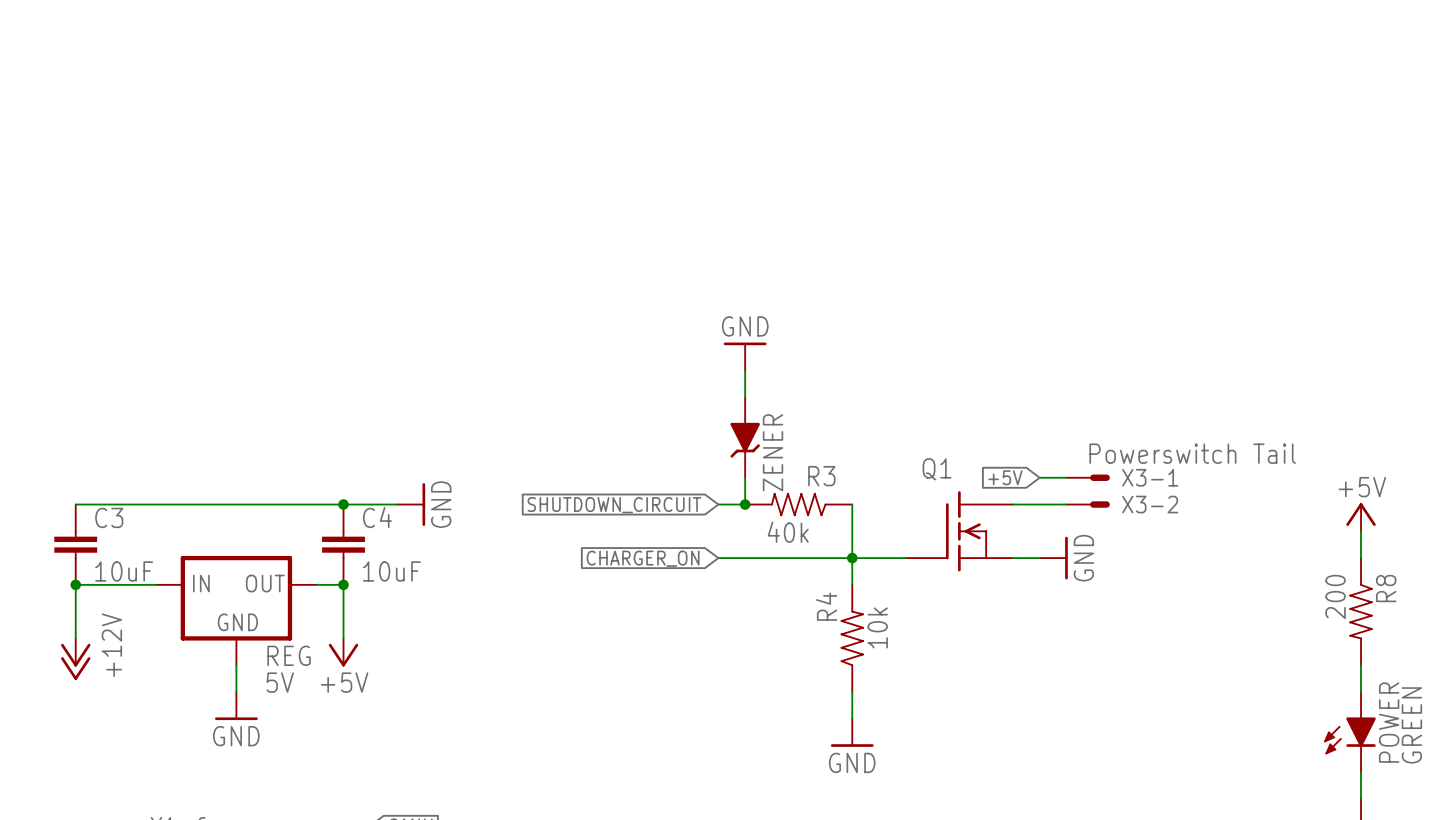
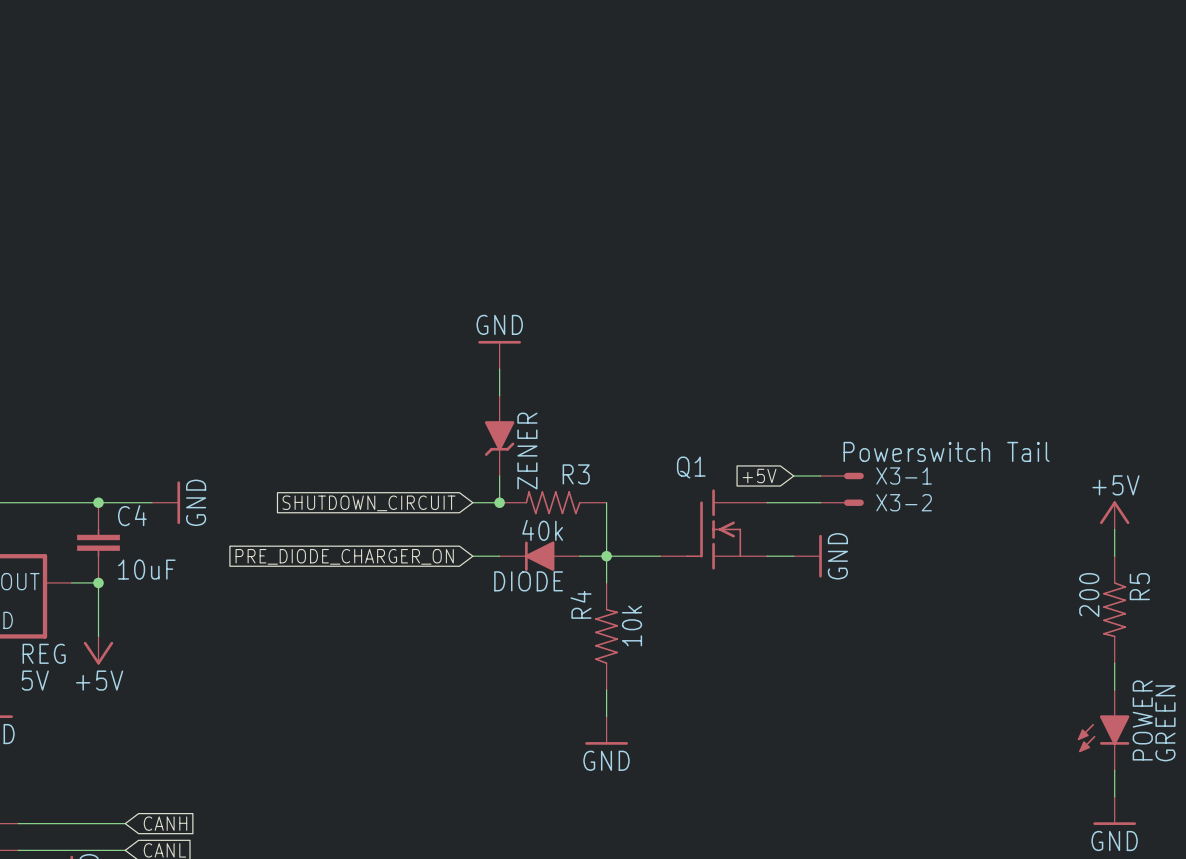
global label: CHARGER_ON (643, 558) -> PRE_DIODE_CHARGER_ON (344, 556)
part: none -> DIODE (539, 556)
R8 name: R8 (1386, 588) -> R5 (1139, 586)

